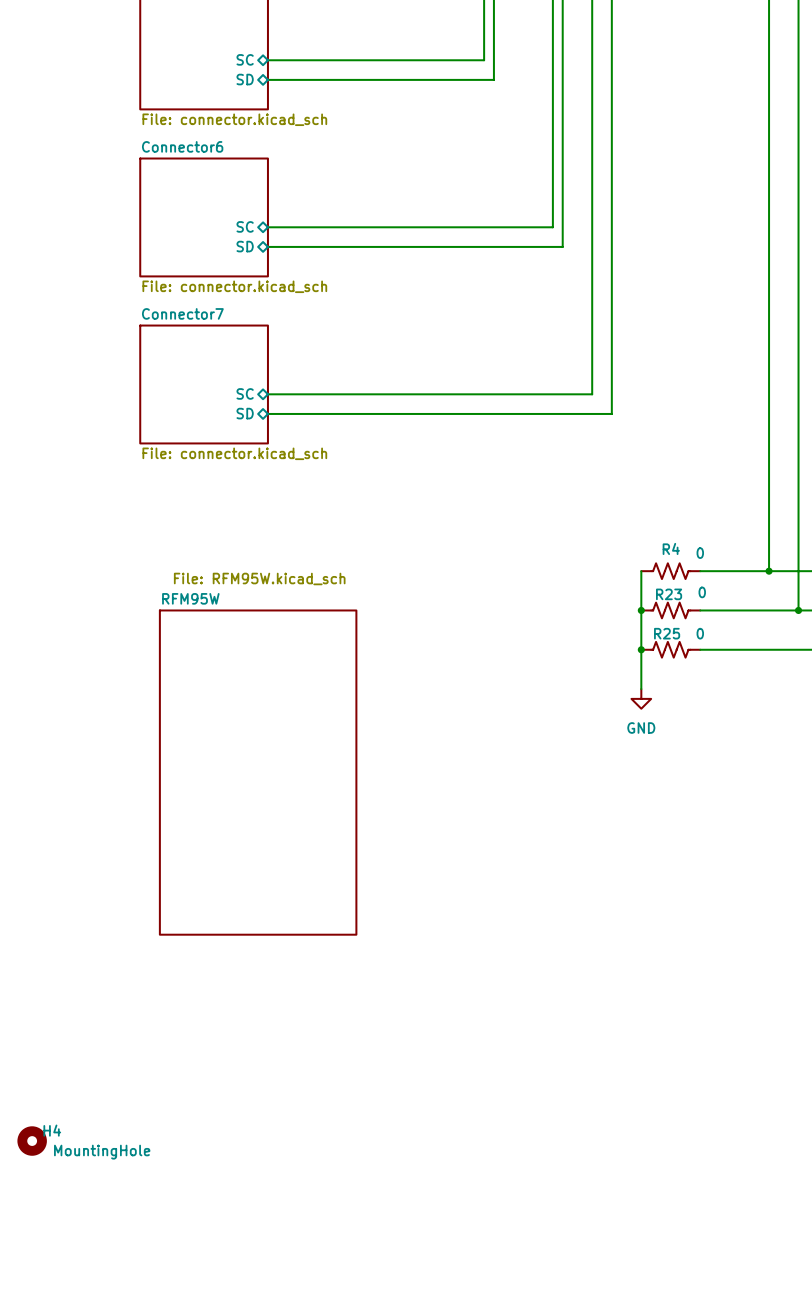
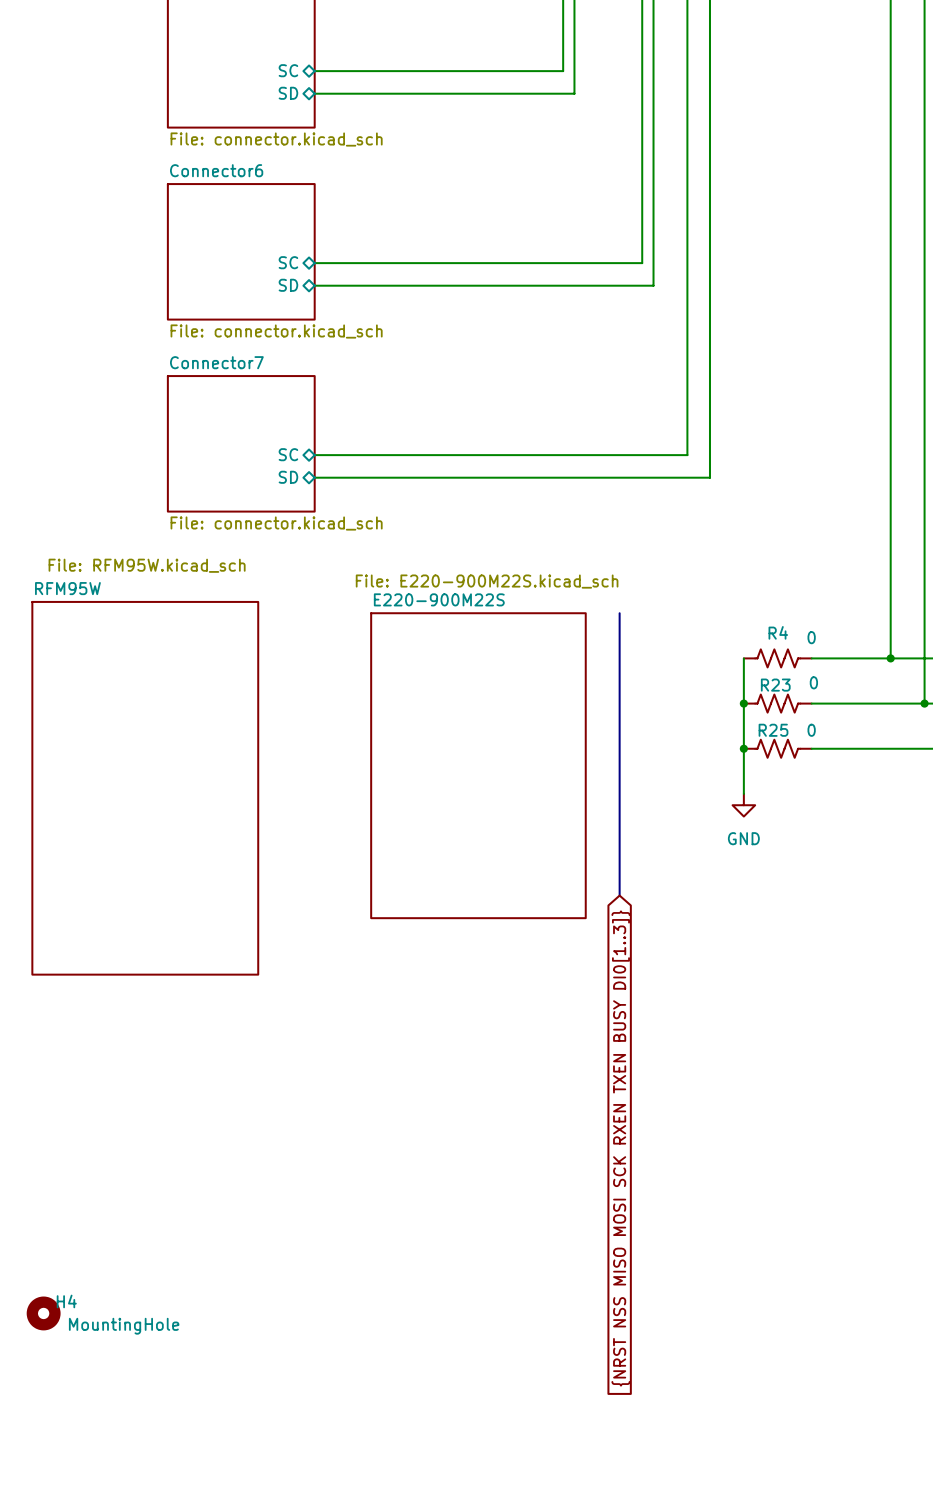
bus: none -> (619, 613) (619, 895)
sheet E220-900M22S: none -> File: E220-900M22S.kicad_sch (478, 765)
sheet RFM95W position: (258, 772) -> (145, 788)
global label: none -> {NRST NSS MISO MOSI SCK RXEN TXEN BUSY DI0[1..3]} (620, 1148)

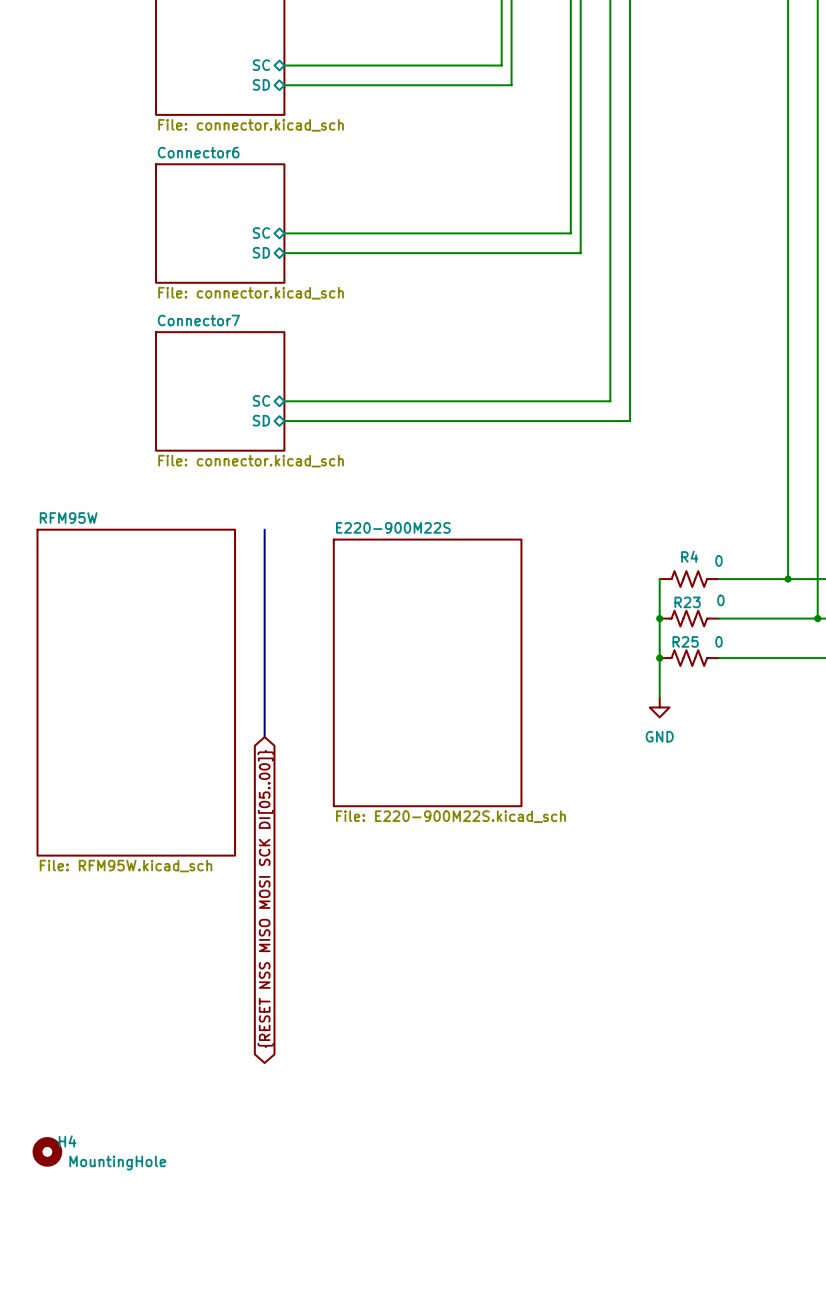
sheet RFM95W value position: File: RFM95W.kicad_sch (147, 565) -> File: RFM95W.kicad_sch (125, 866)
sheet E220-900M22S value position: File: E220-900M22S.kicad_sch (487, 581) -> File: E220-900M22S.kicad_sch (450, 816)
bus: none -> (264, 529) (264, 737)
bus: (619, 613) (619, 895) -> none
global label: none -> {RESET NSS MISO MOSI SCK DI[05..00]} (265, 899)
global label: {NRST NSS MISO MOSI SCK RXEN TXEN BUSY DI0[1..3]} (620, 1148) -> none

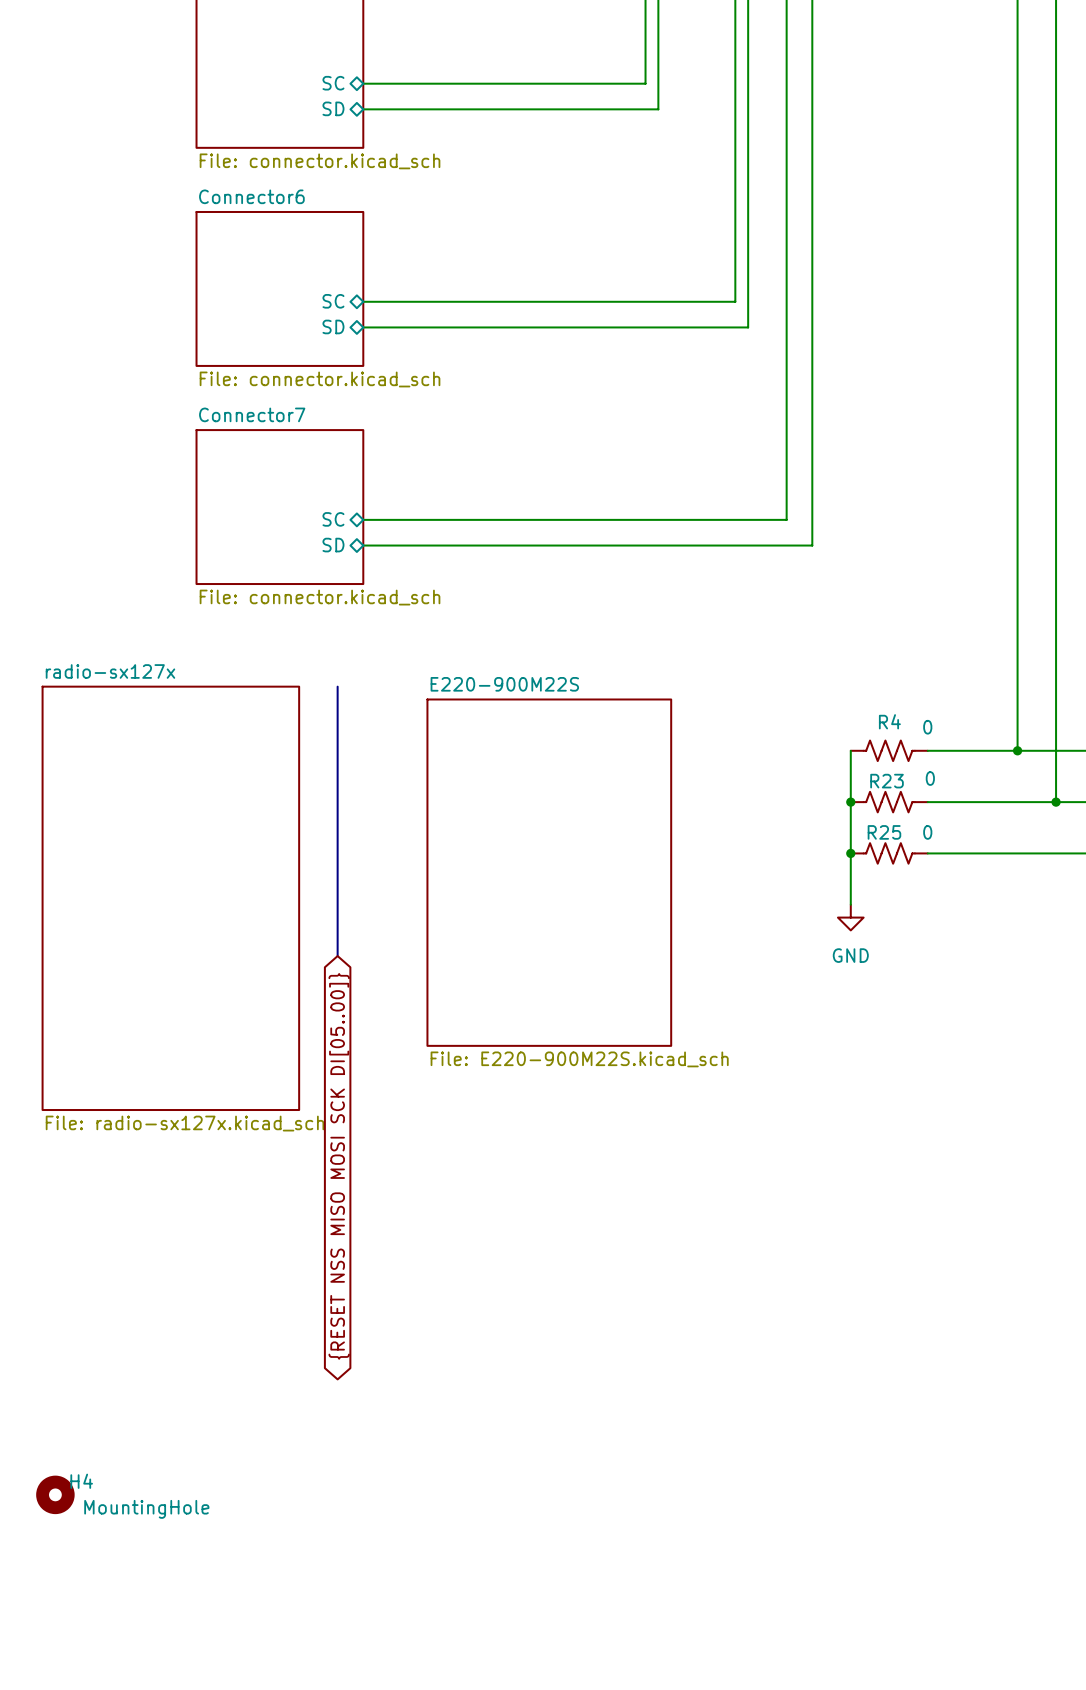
sheet RFM95W name: RFM95W (68, 518) -> radio-sx127x (110, 671)
sheet RFM95W value: File: RFM95W.kicad_sch (125, 866) -> File: radio-sx127x.kicad_sch (185, 1123)

